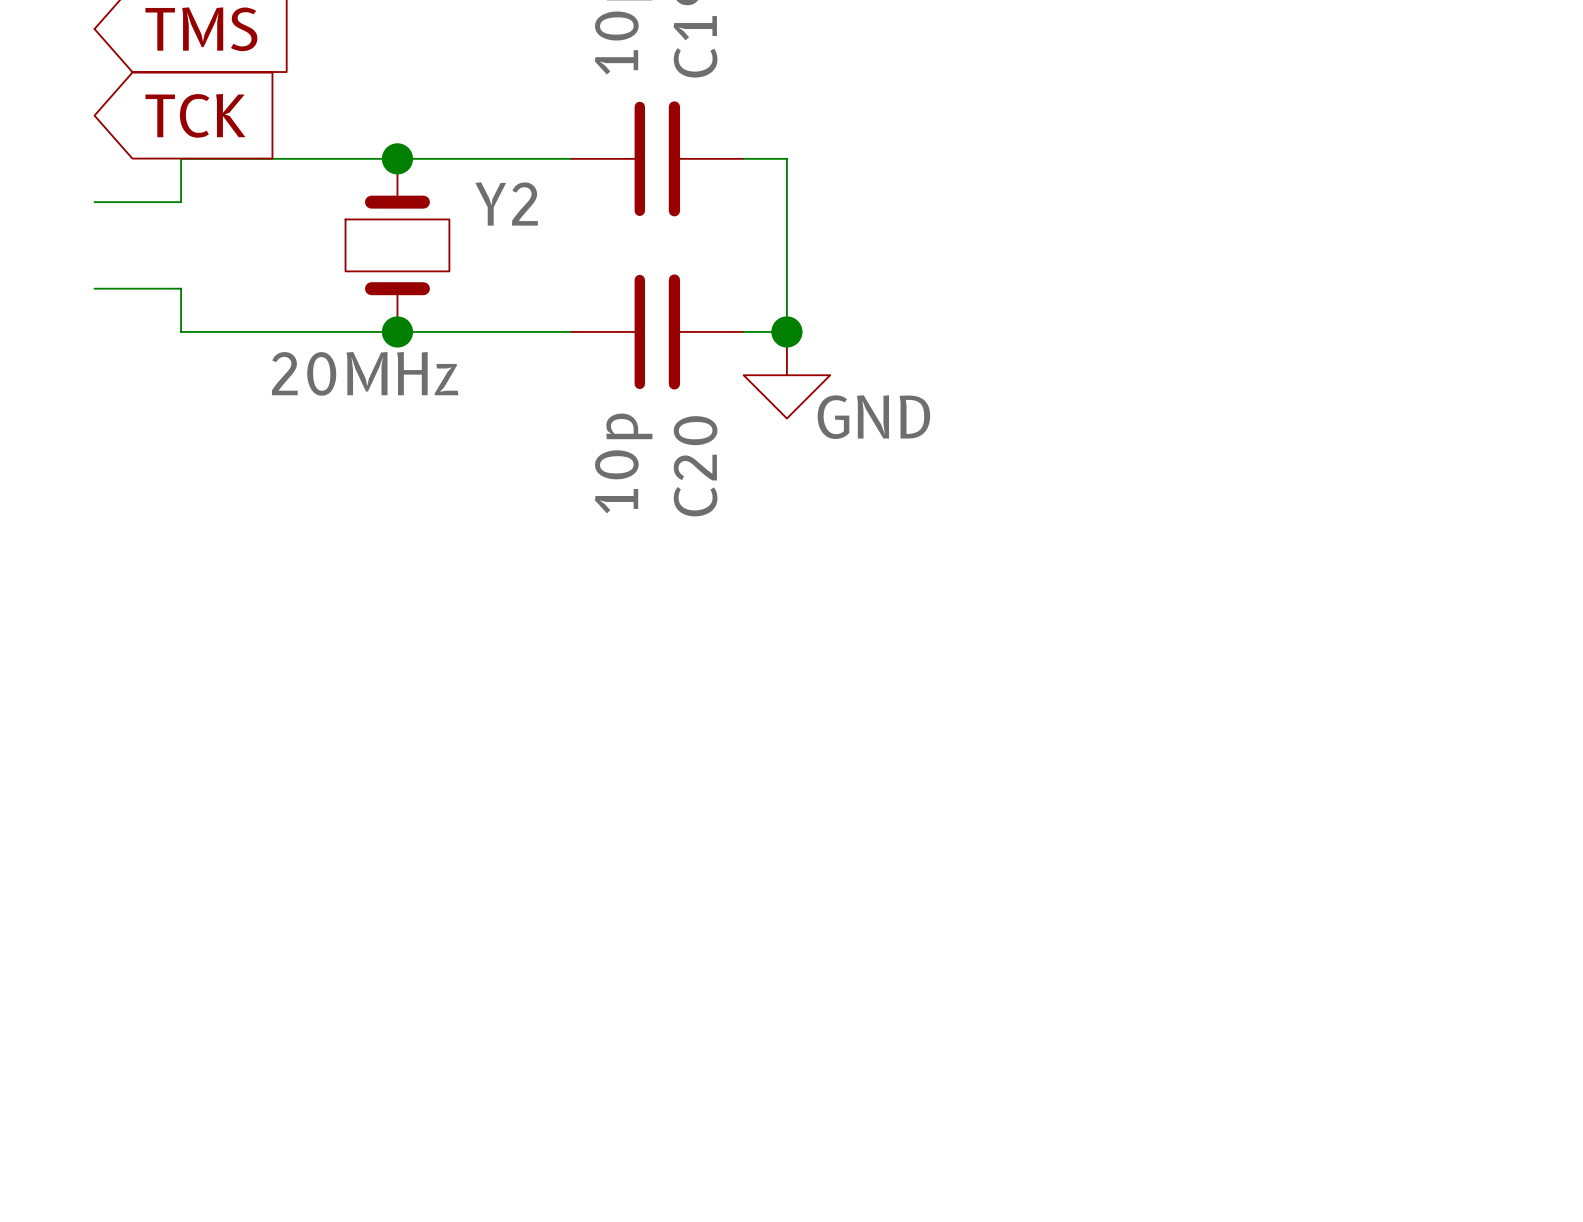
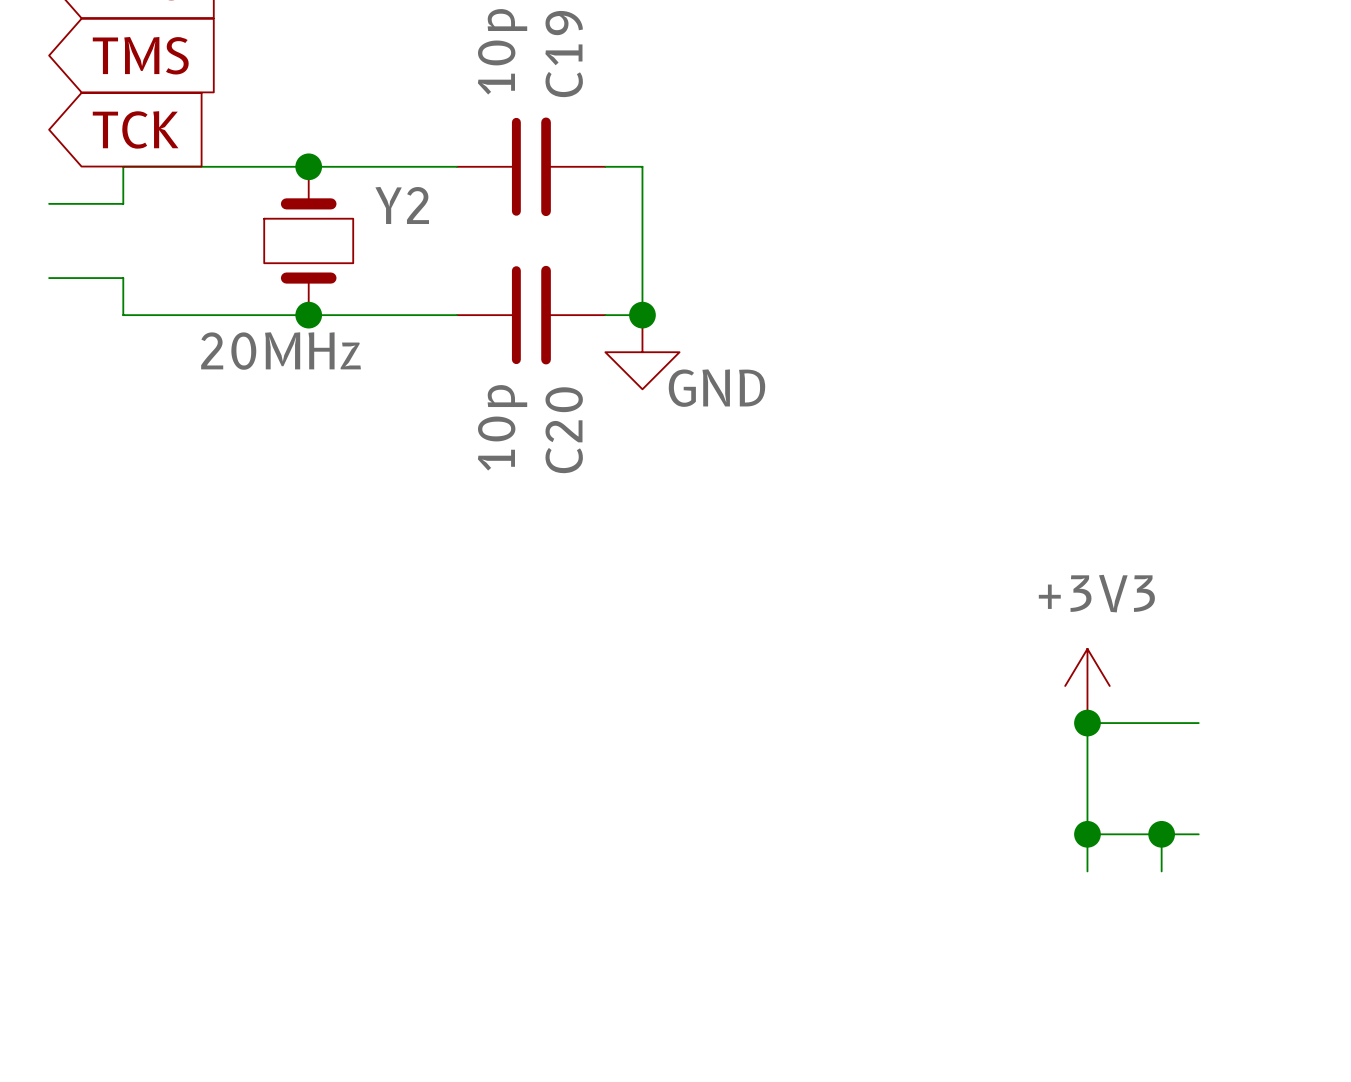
power symbol: none -> +3V3 (1087, 685)
junction: none -> (1087, 723)
wire: none -> (1198, 723) (1087, 723) (1087, 871)
wire: none -> (1087, 834) (1198, 834)
junction: none -> (1087, 834)
wire: none -> (1161, 834) (1161, 871)
junction: none -> (1161, 834)

